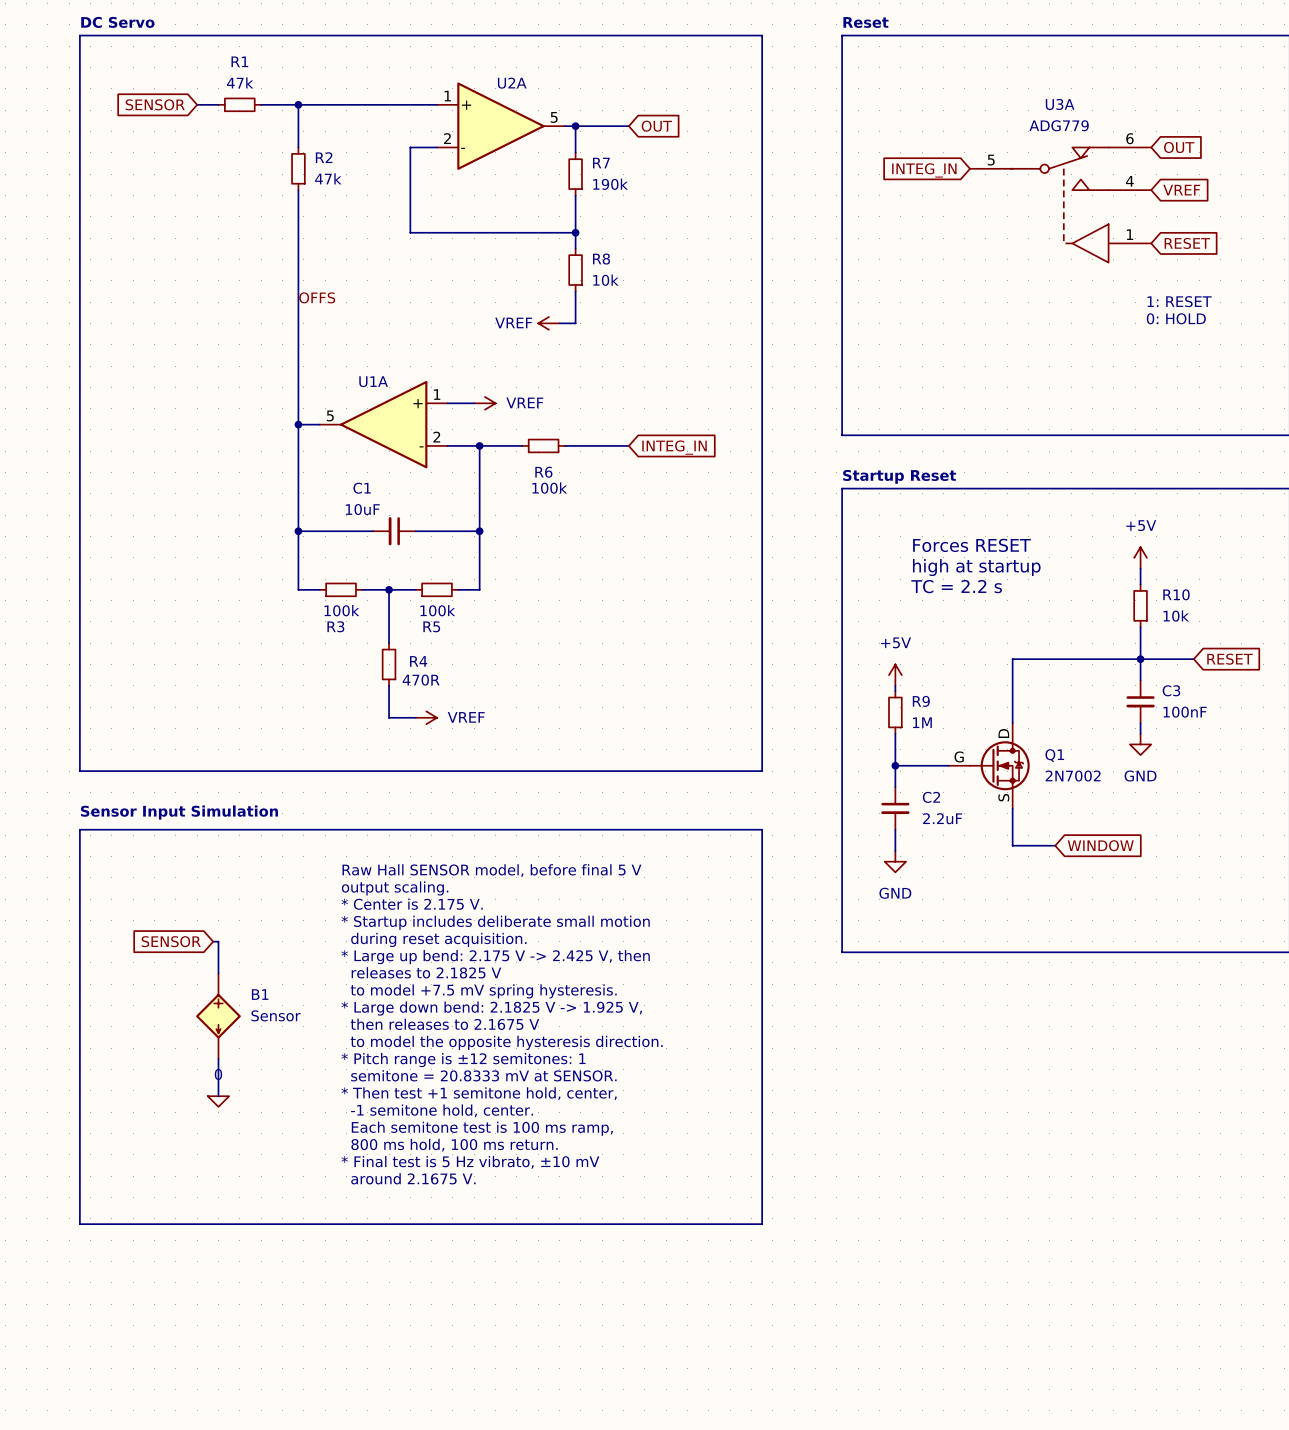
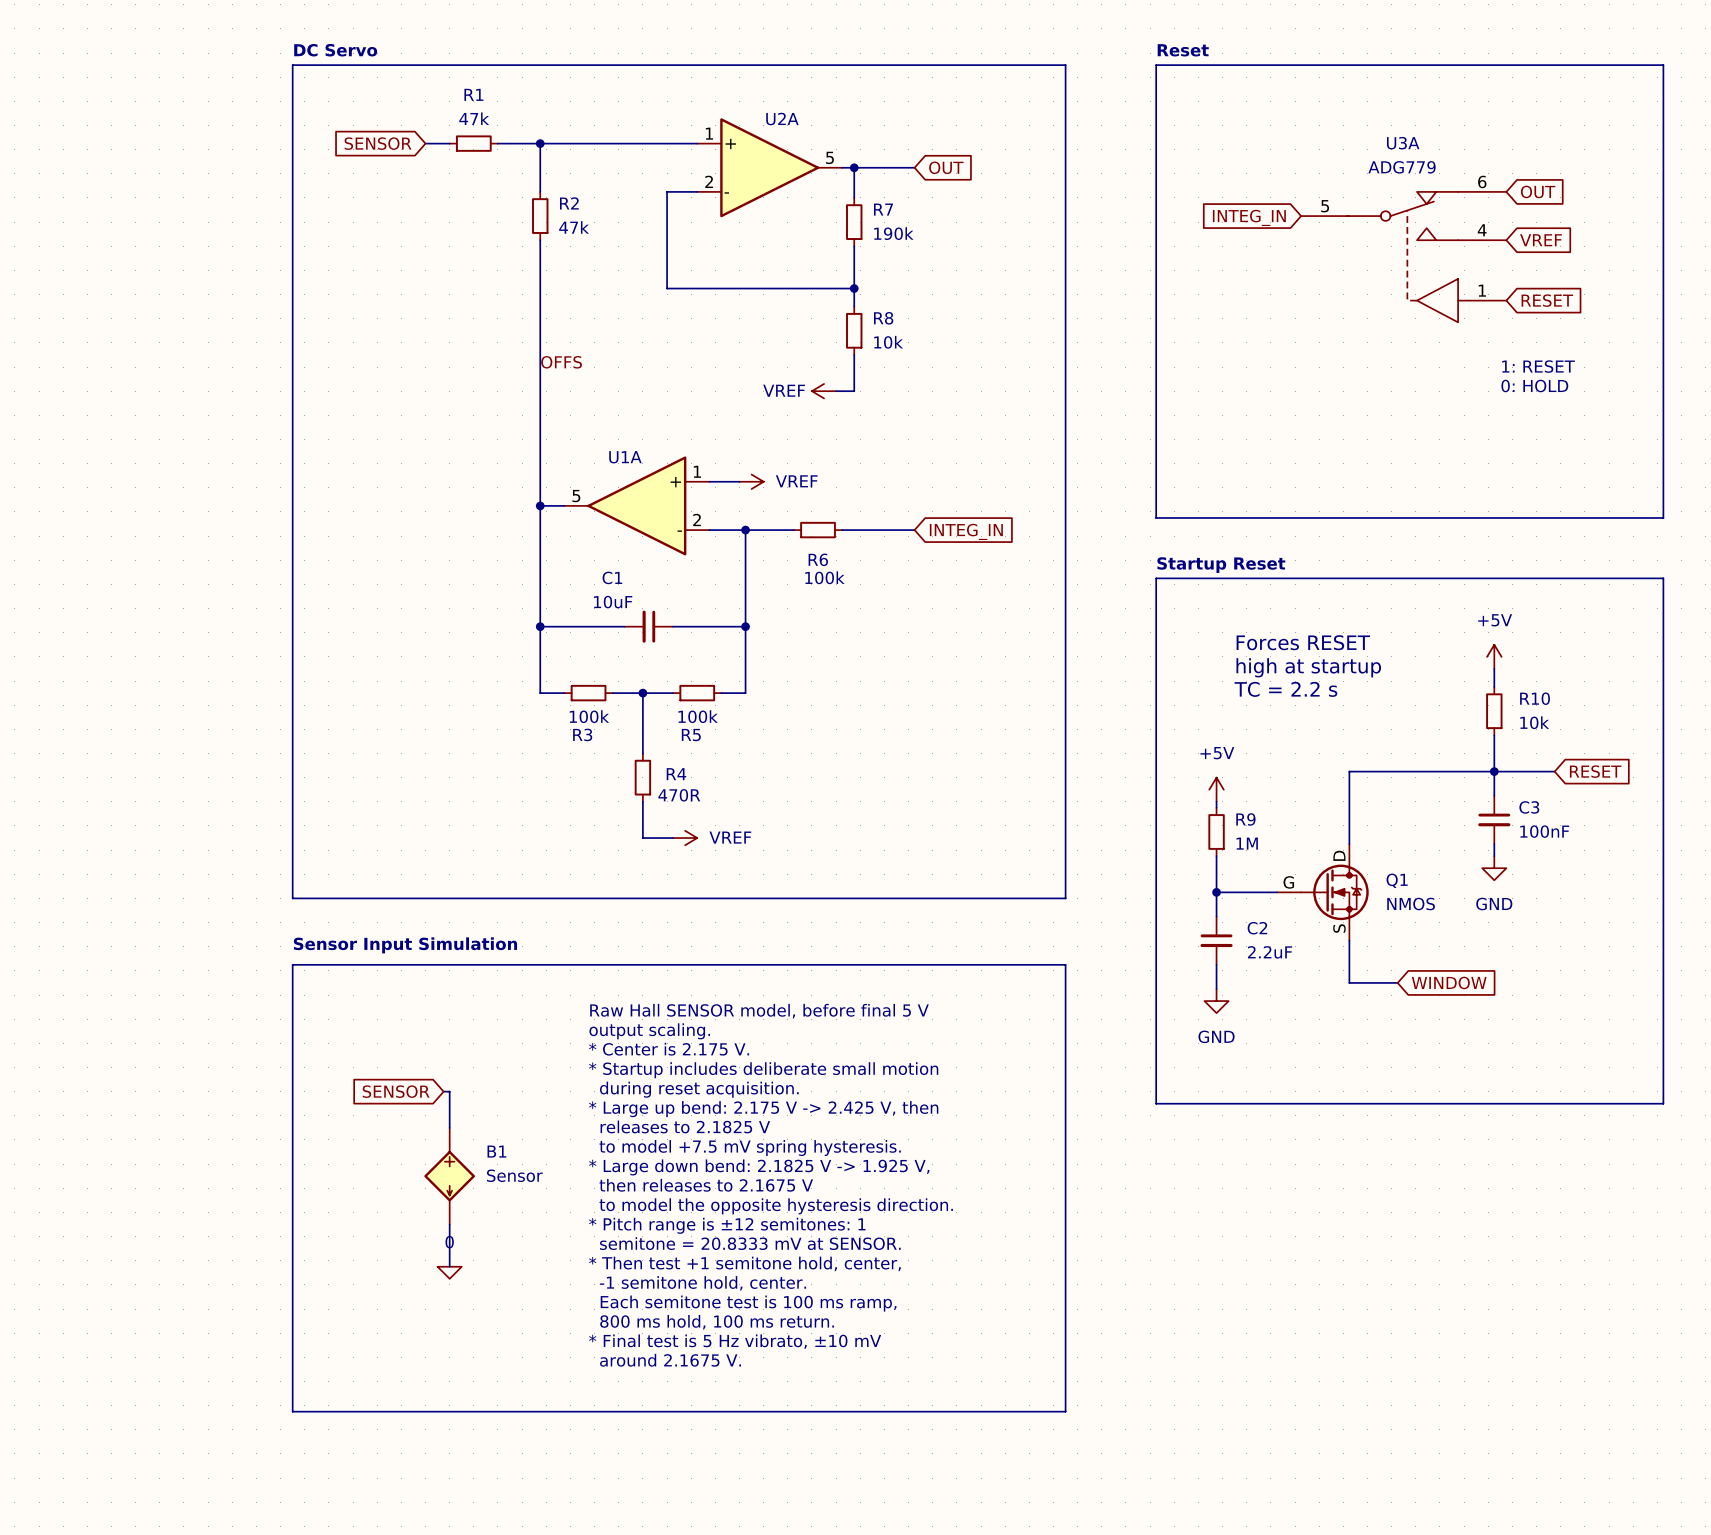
Q1 value: 2N7002 (1073, 776) -> NMOS (1411, 904)

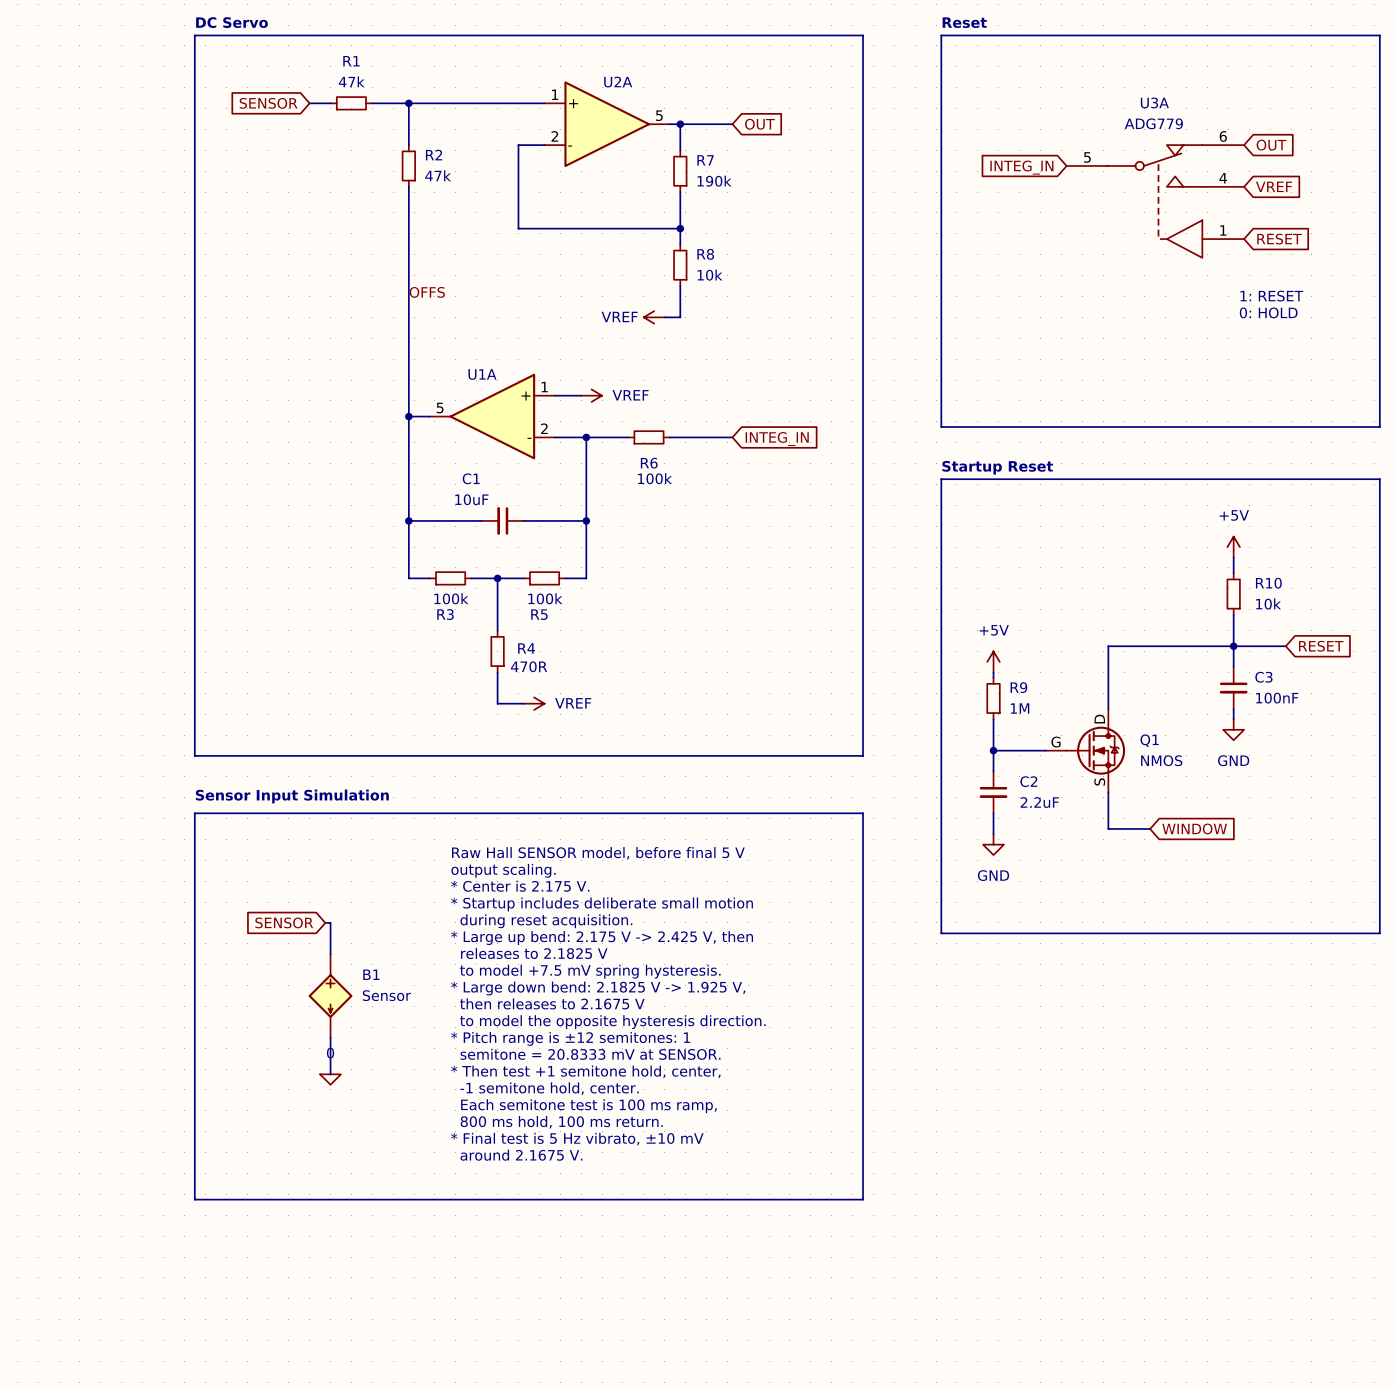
text: Forces RESET (1303, 642) -> none
text: high at startup (1308, 667) -> none
text: TC = 2.2 s (1285, 689) -> none

